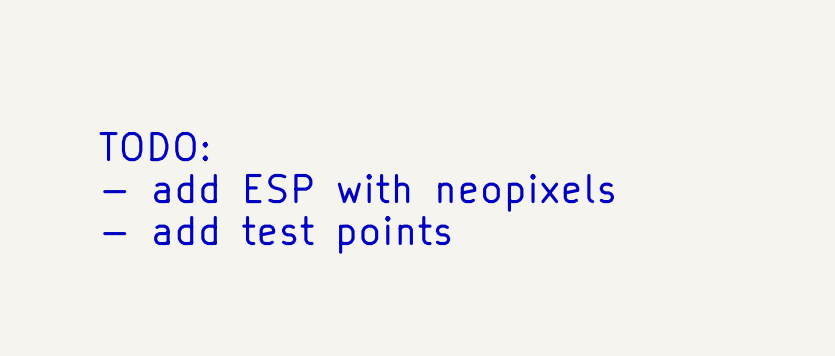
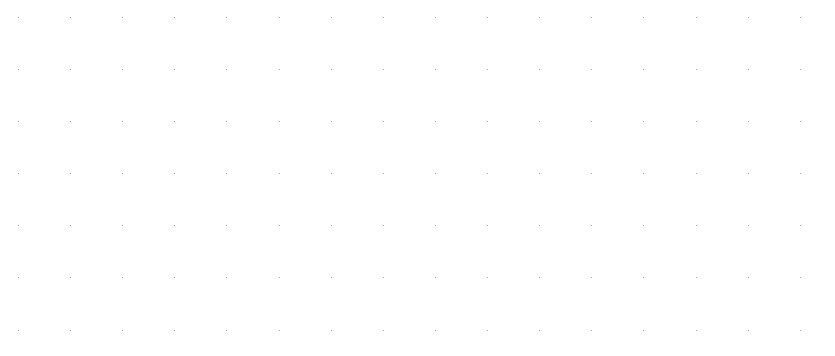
text: TODO: (153, 146) -> none
text: - add ESP with neopixels (358, 192) -> none
text: - add test points (276, 234) -> none

